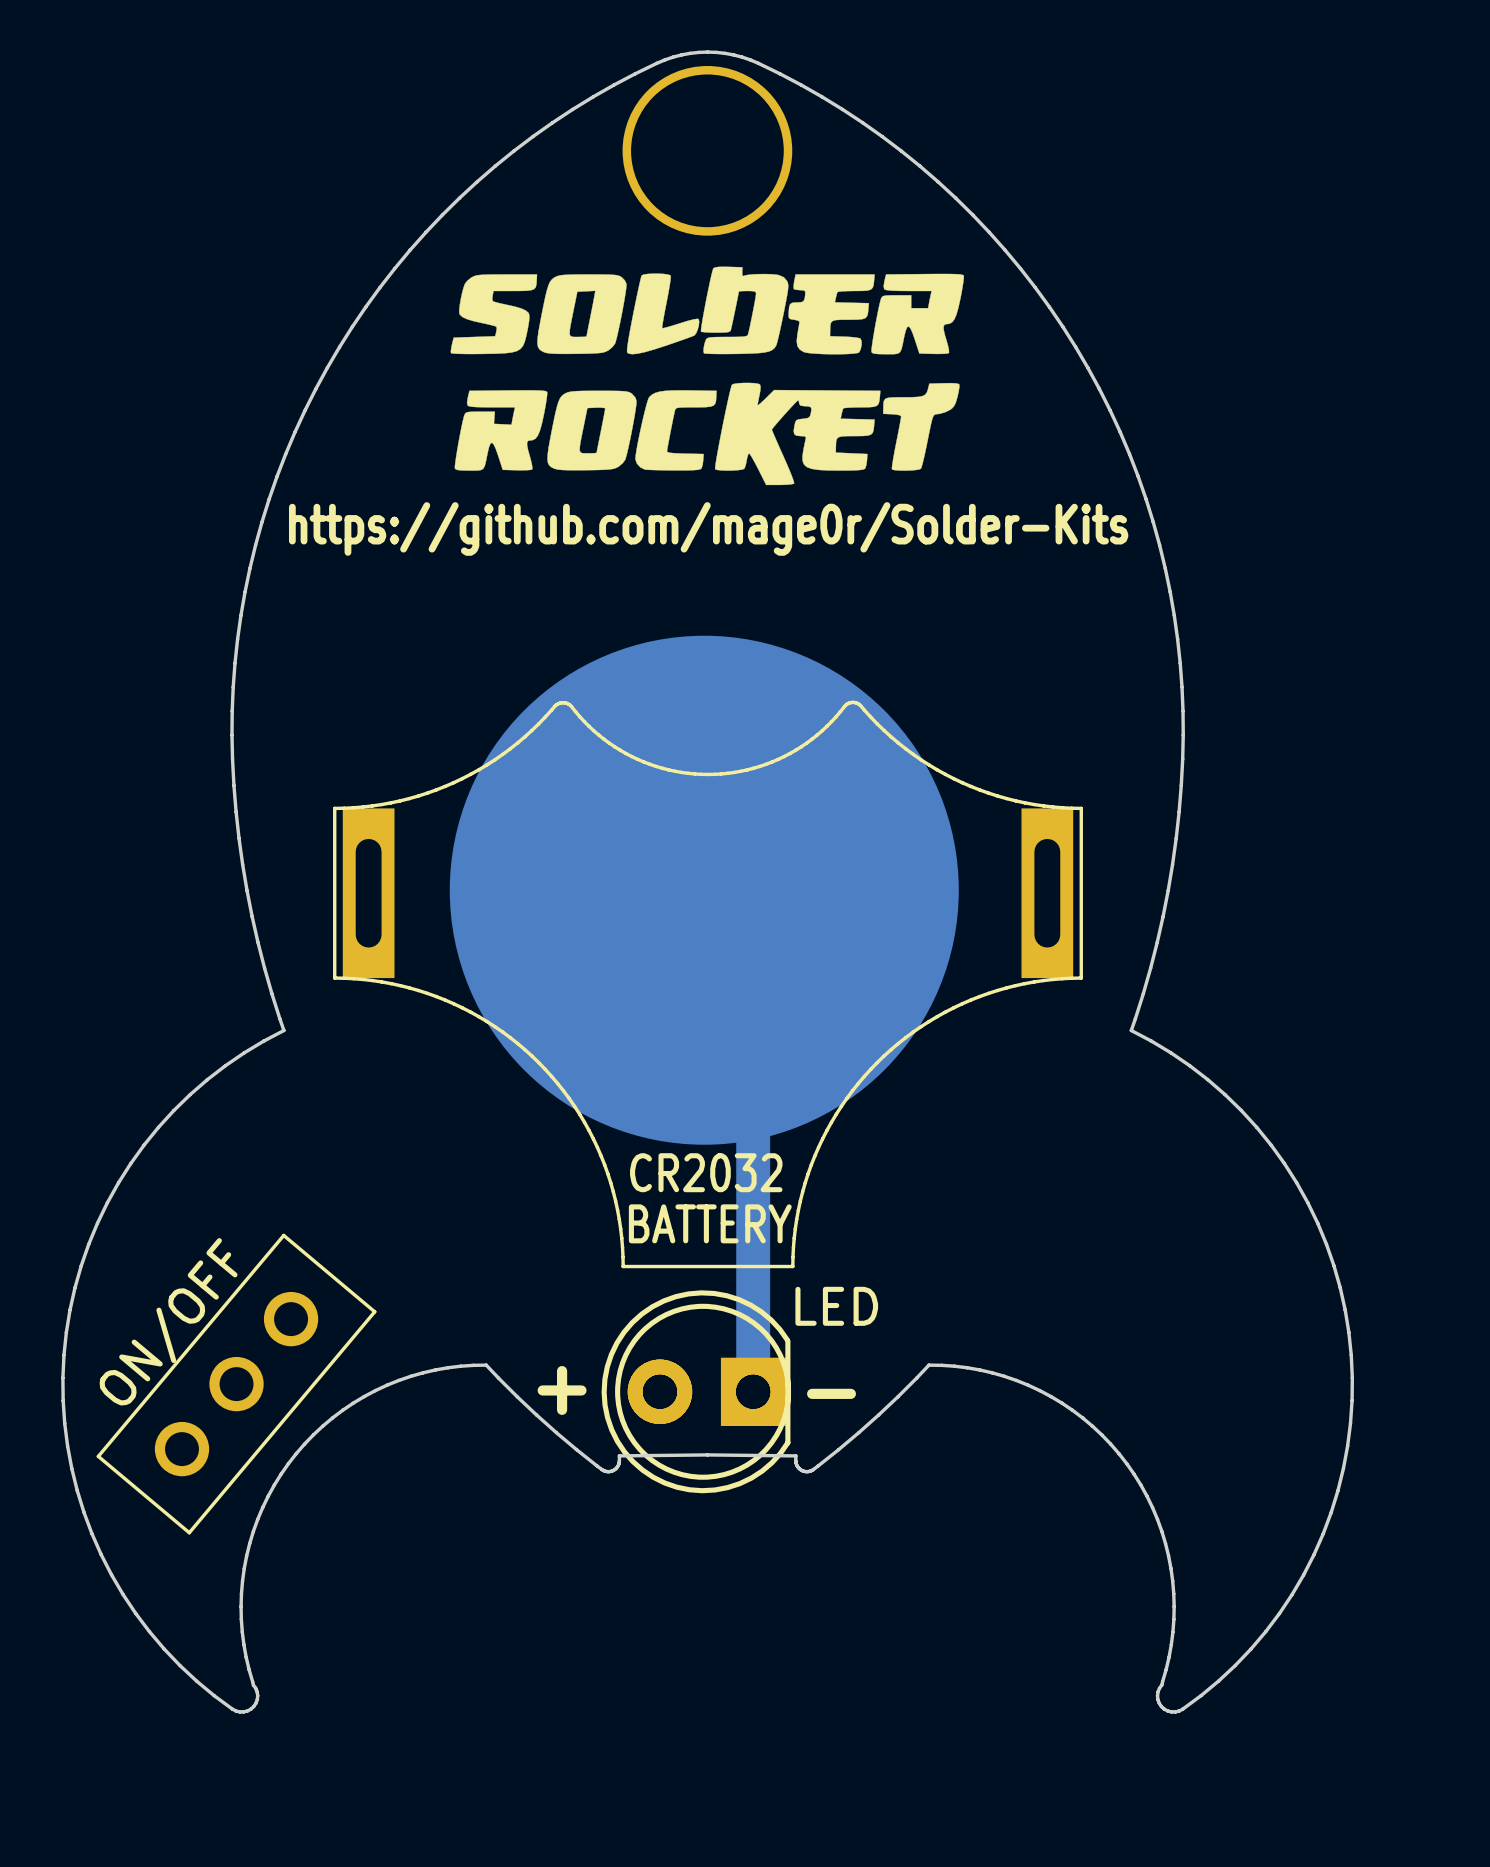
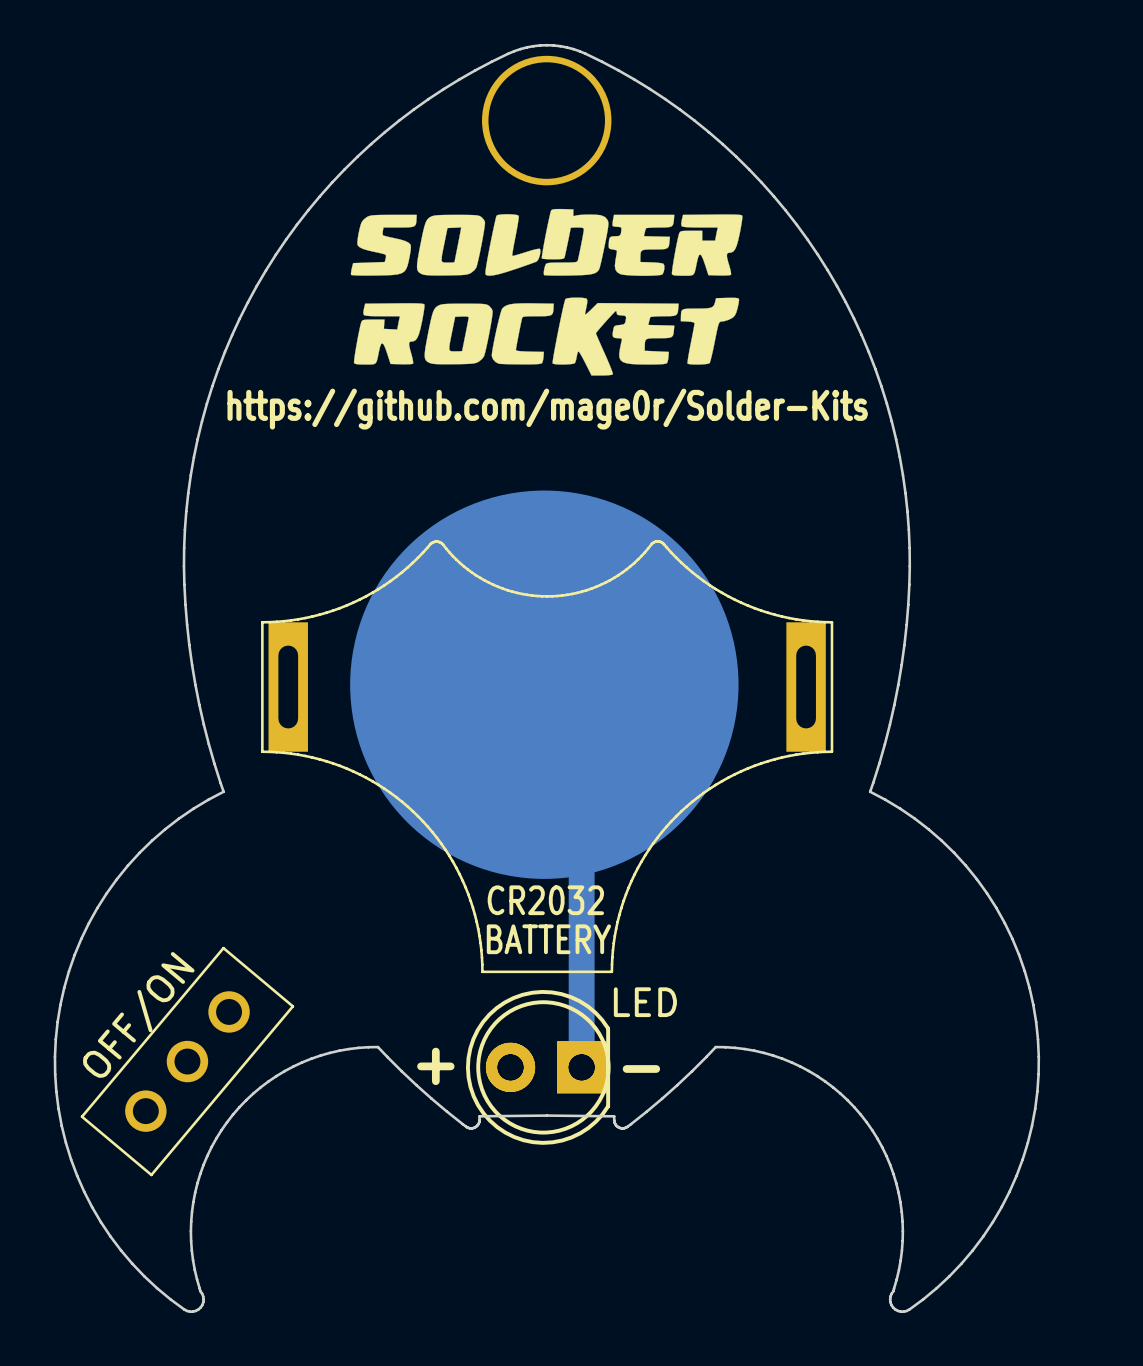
part value: ON/OFF (168, 1321) -> OFF/ON (138, 1014)

